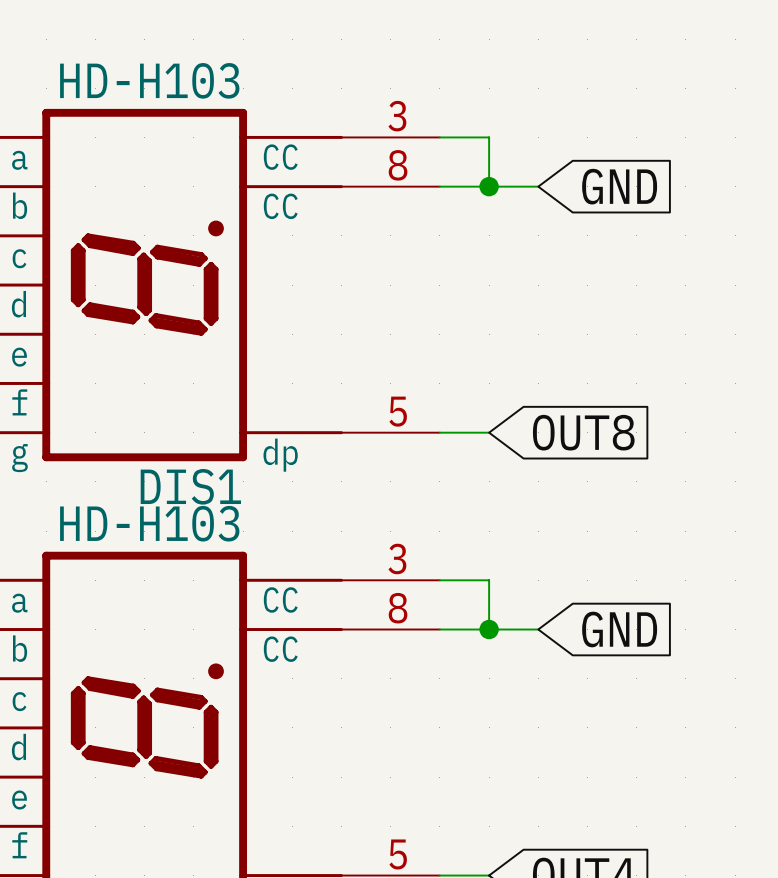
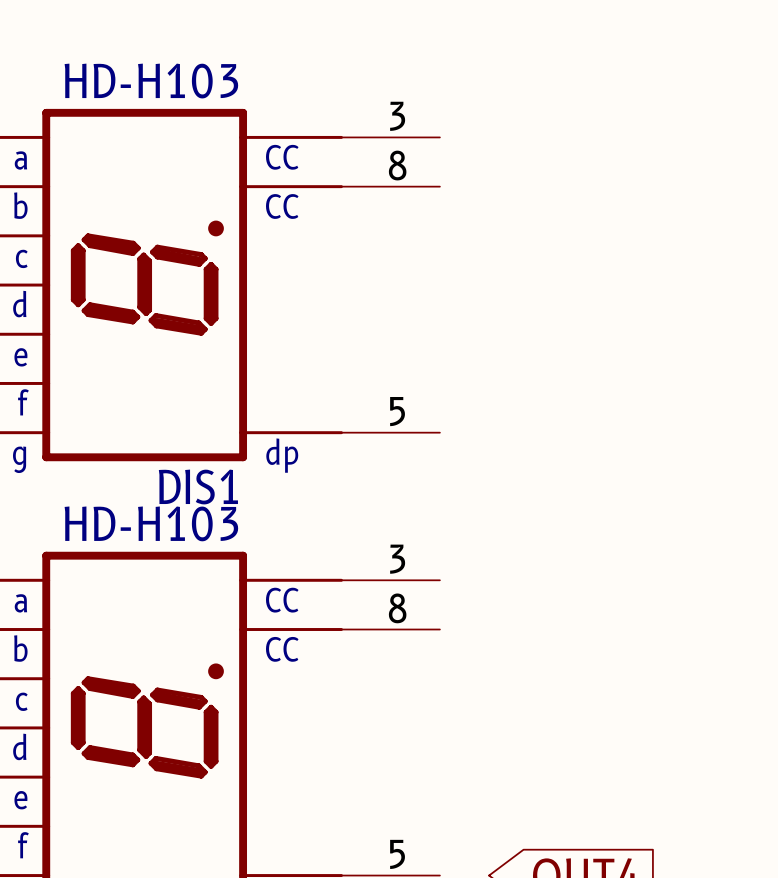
wire: (439, 137) (489, 137) (489, 186) -> none
wire: (439, 186) (538, 186) -> none
junction: (489, 186) -> none
global label: GND (619, 186) -> none
wire: (439, 432) (489, 432) -> none
global label: OUT8 (583, 432) -> none
wire: (439, 580) (489, 580) (489, 629) -> none
wire: (439, 629) (538, 629) -> none
junction: (489, 629) -> none
global label: GND (619, 629) -> none
wire: (439, 875) (489, 875) -> none

